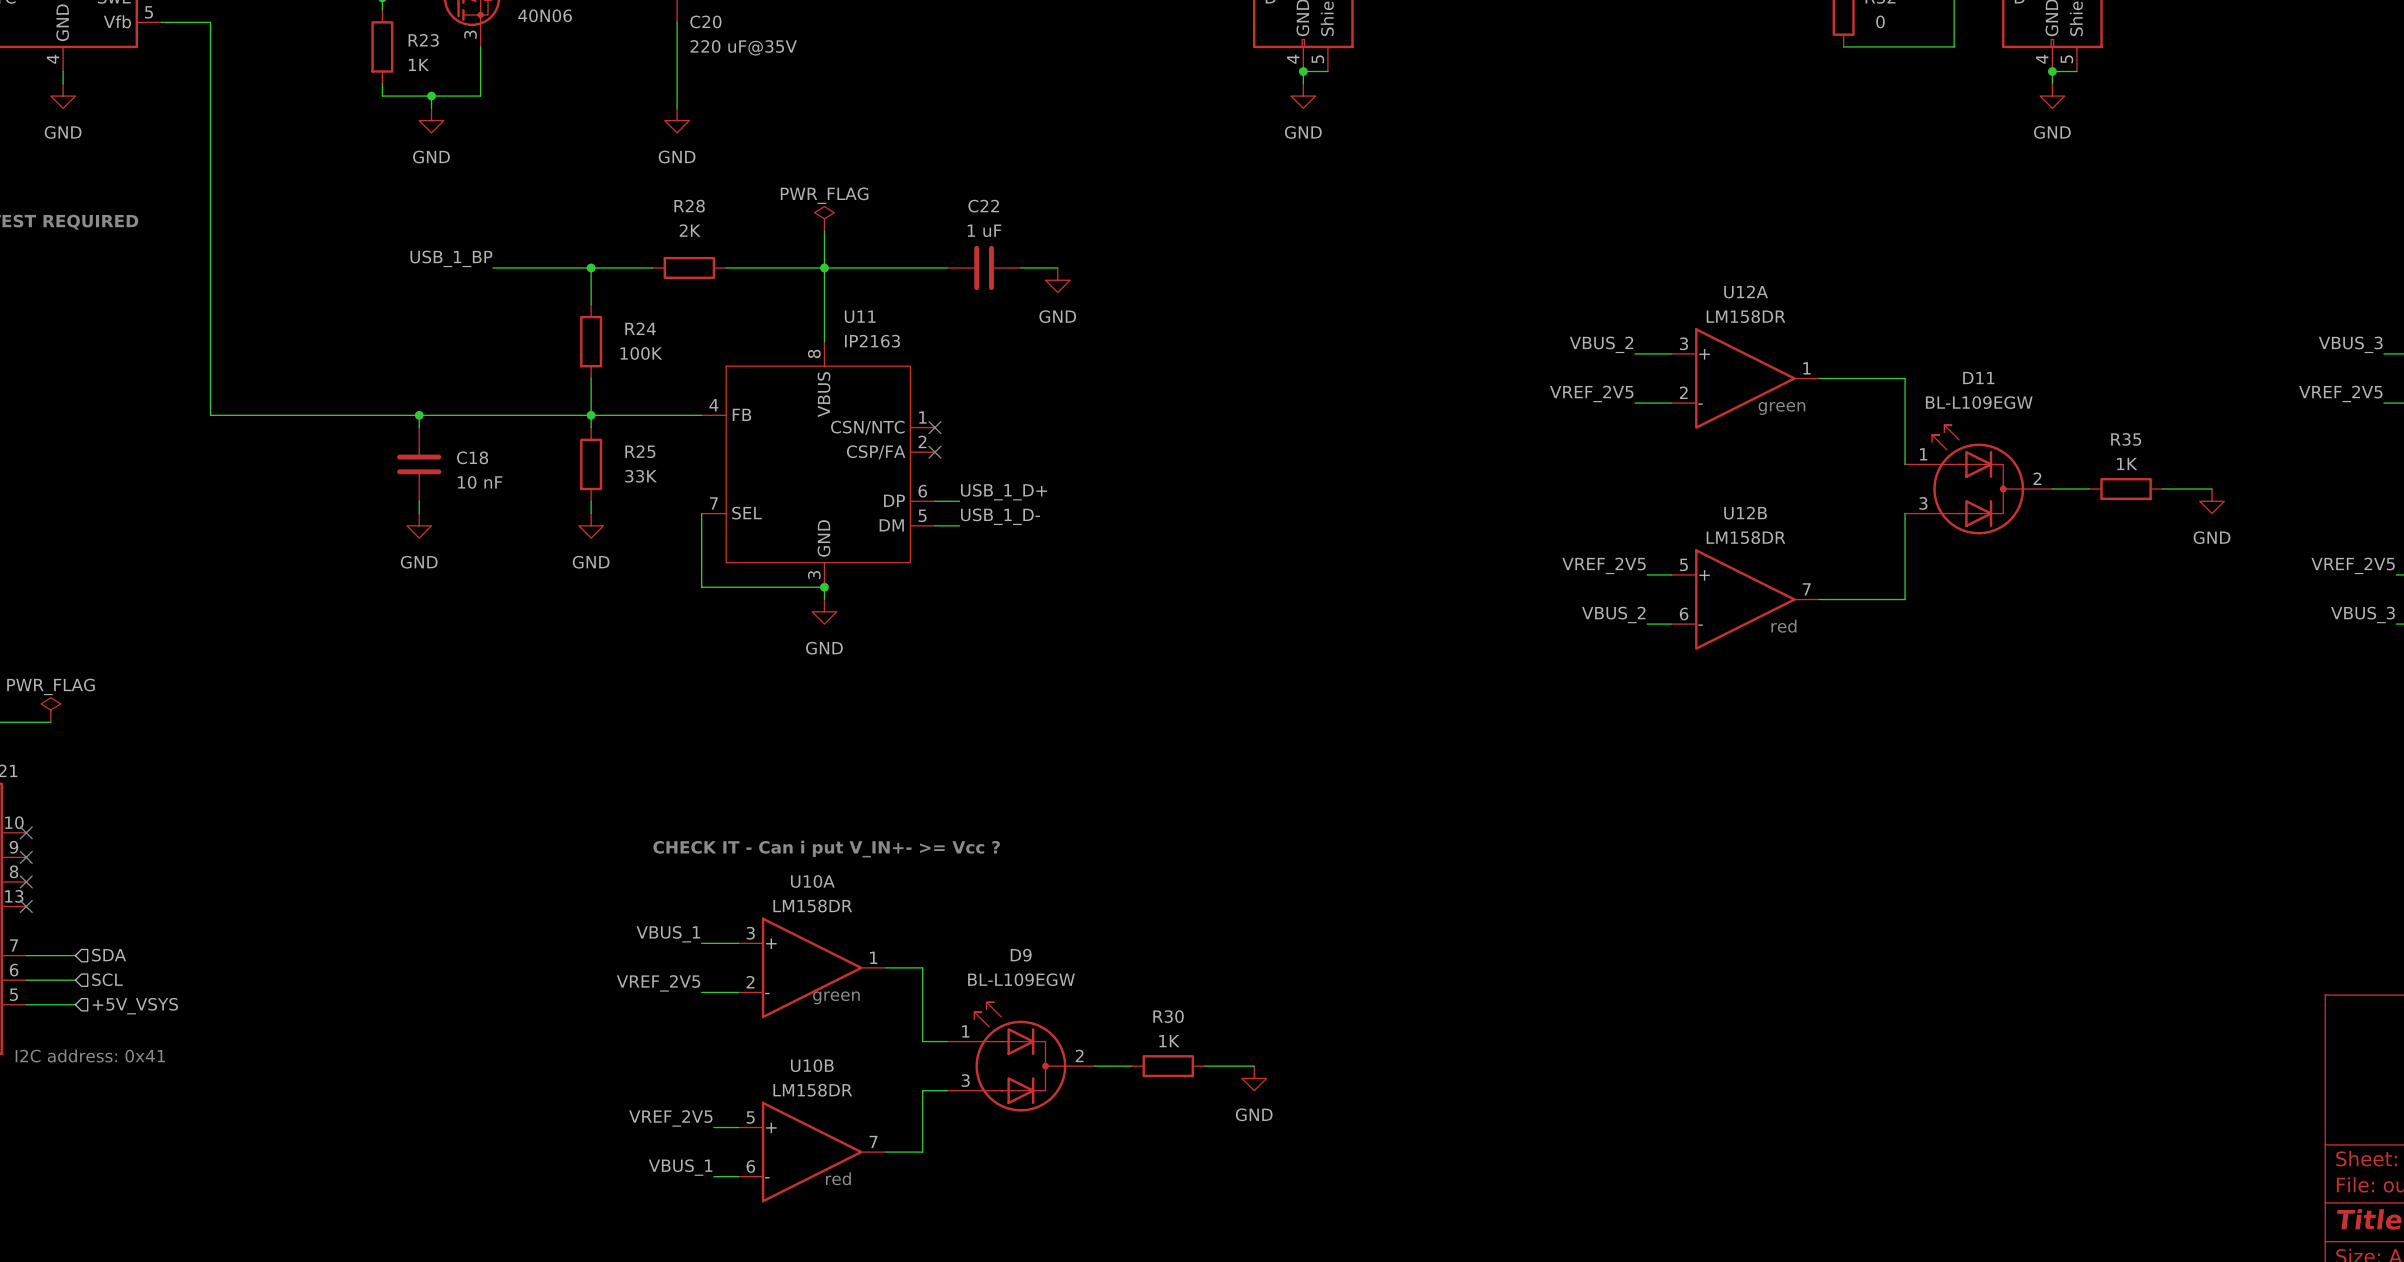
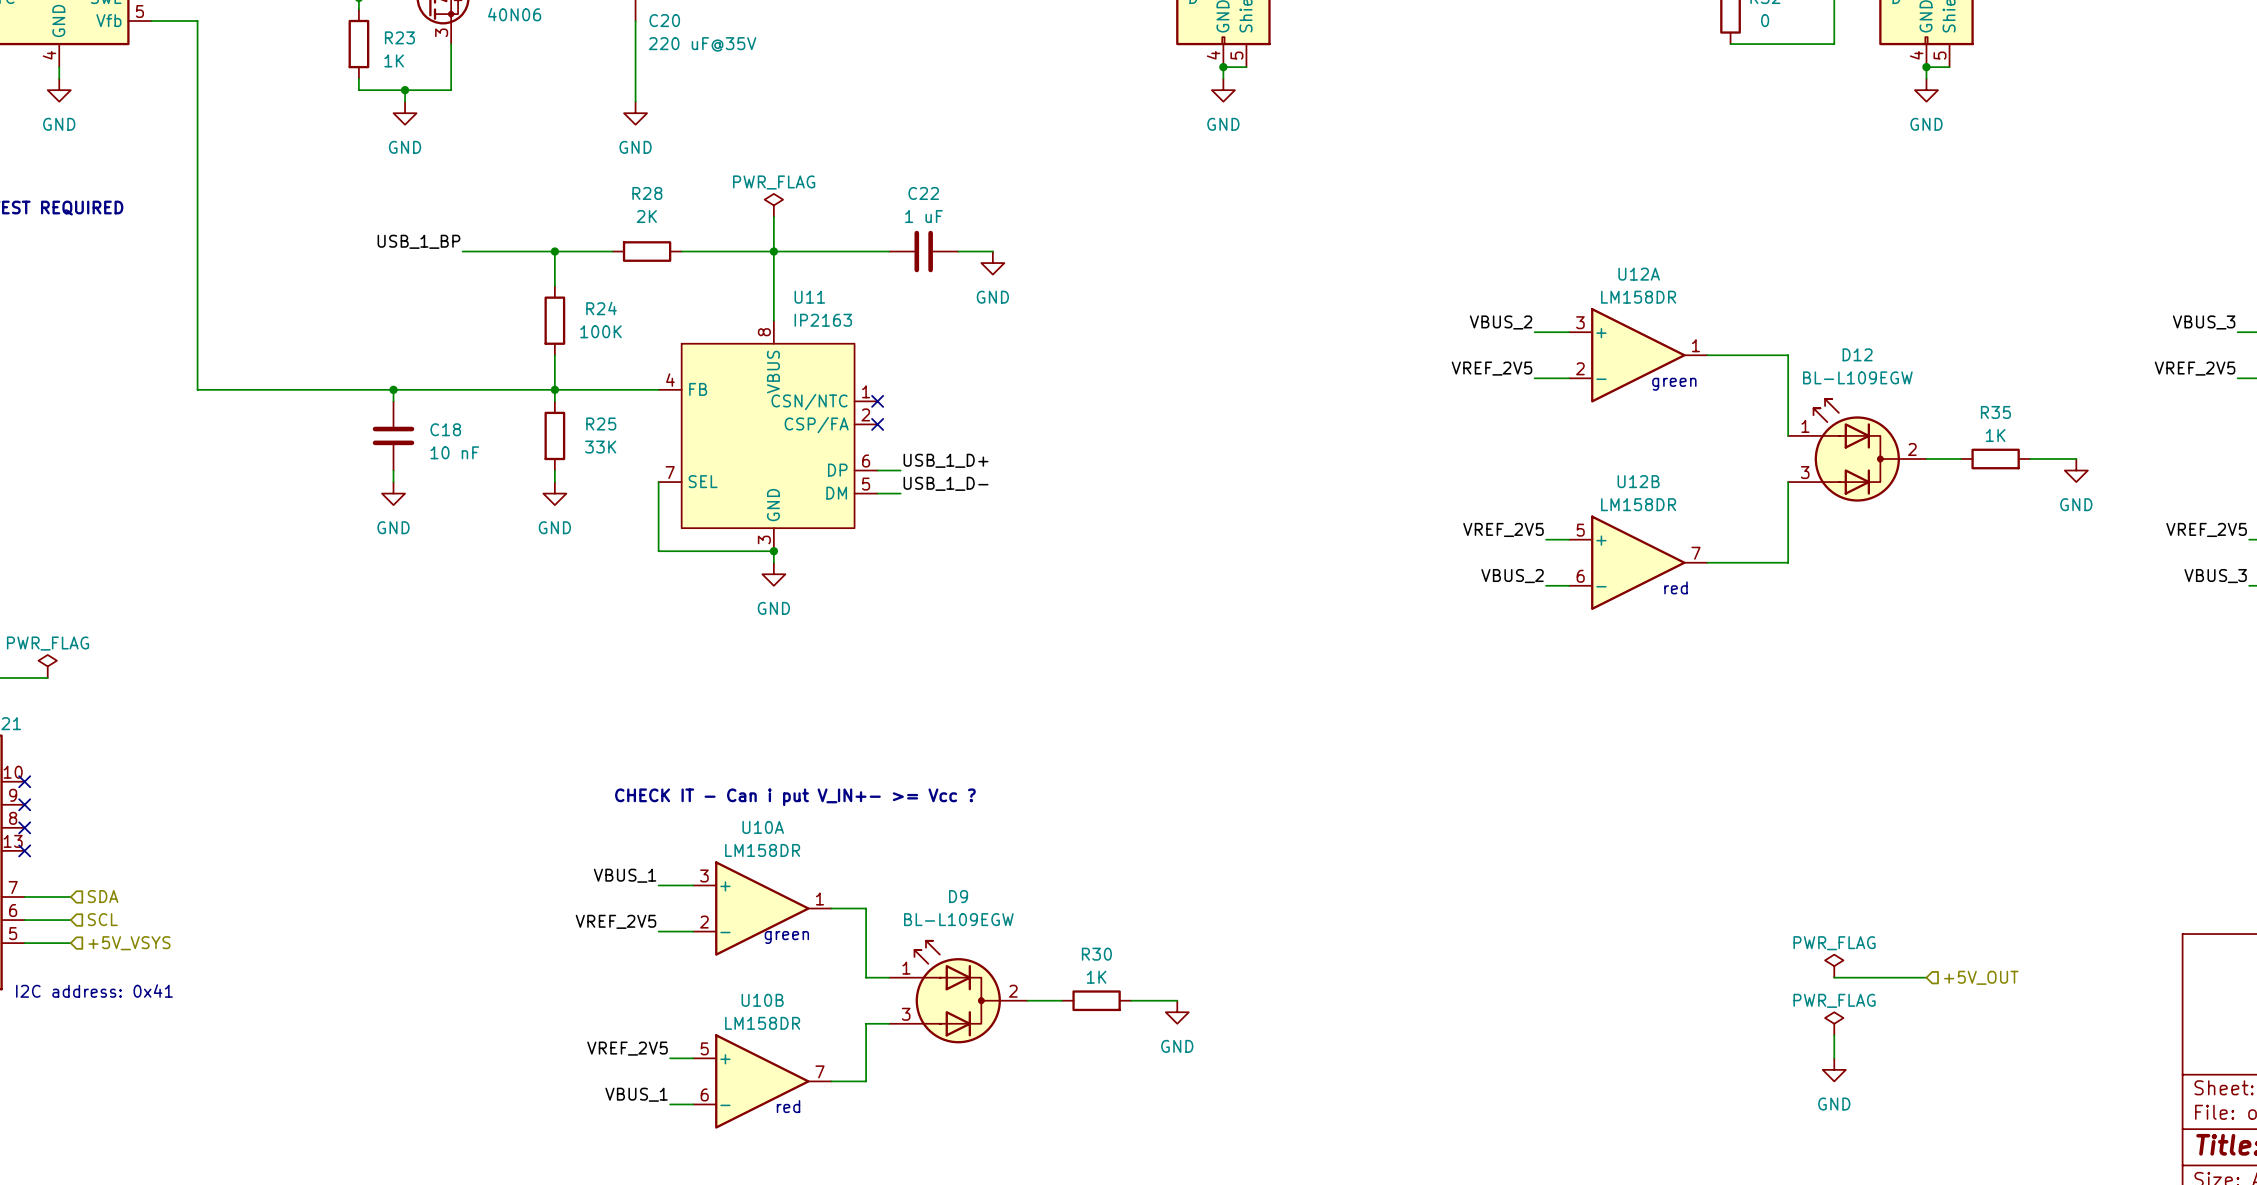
D11 name: D11 (1978, 378) -> D12 (1857, 354)
power symbol: none -> PWR_FLAG (1834, 966)
wire: none -> (1834, 977) (1926, 977)
hierarchical label: none -> +5V_OUT (1981, 977)
power symbol: none -> PWR_FLAG (1834, 1023)
wire: none -> (1834, 1035) (1834, 1058)
power symbol: none -> GND (1834, 1069)

